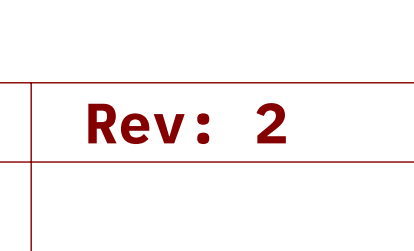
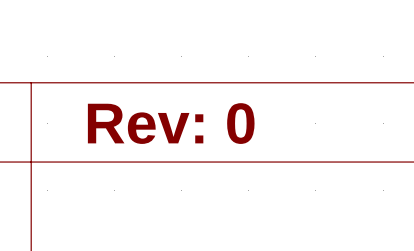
title block: Rev: 2 (187, 123) -> Rev: 0 (171, 123)

